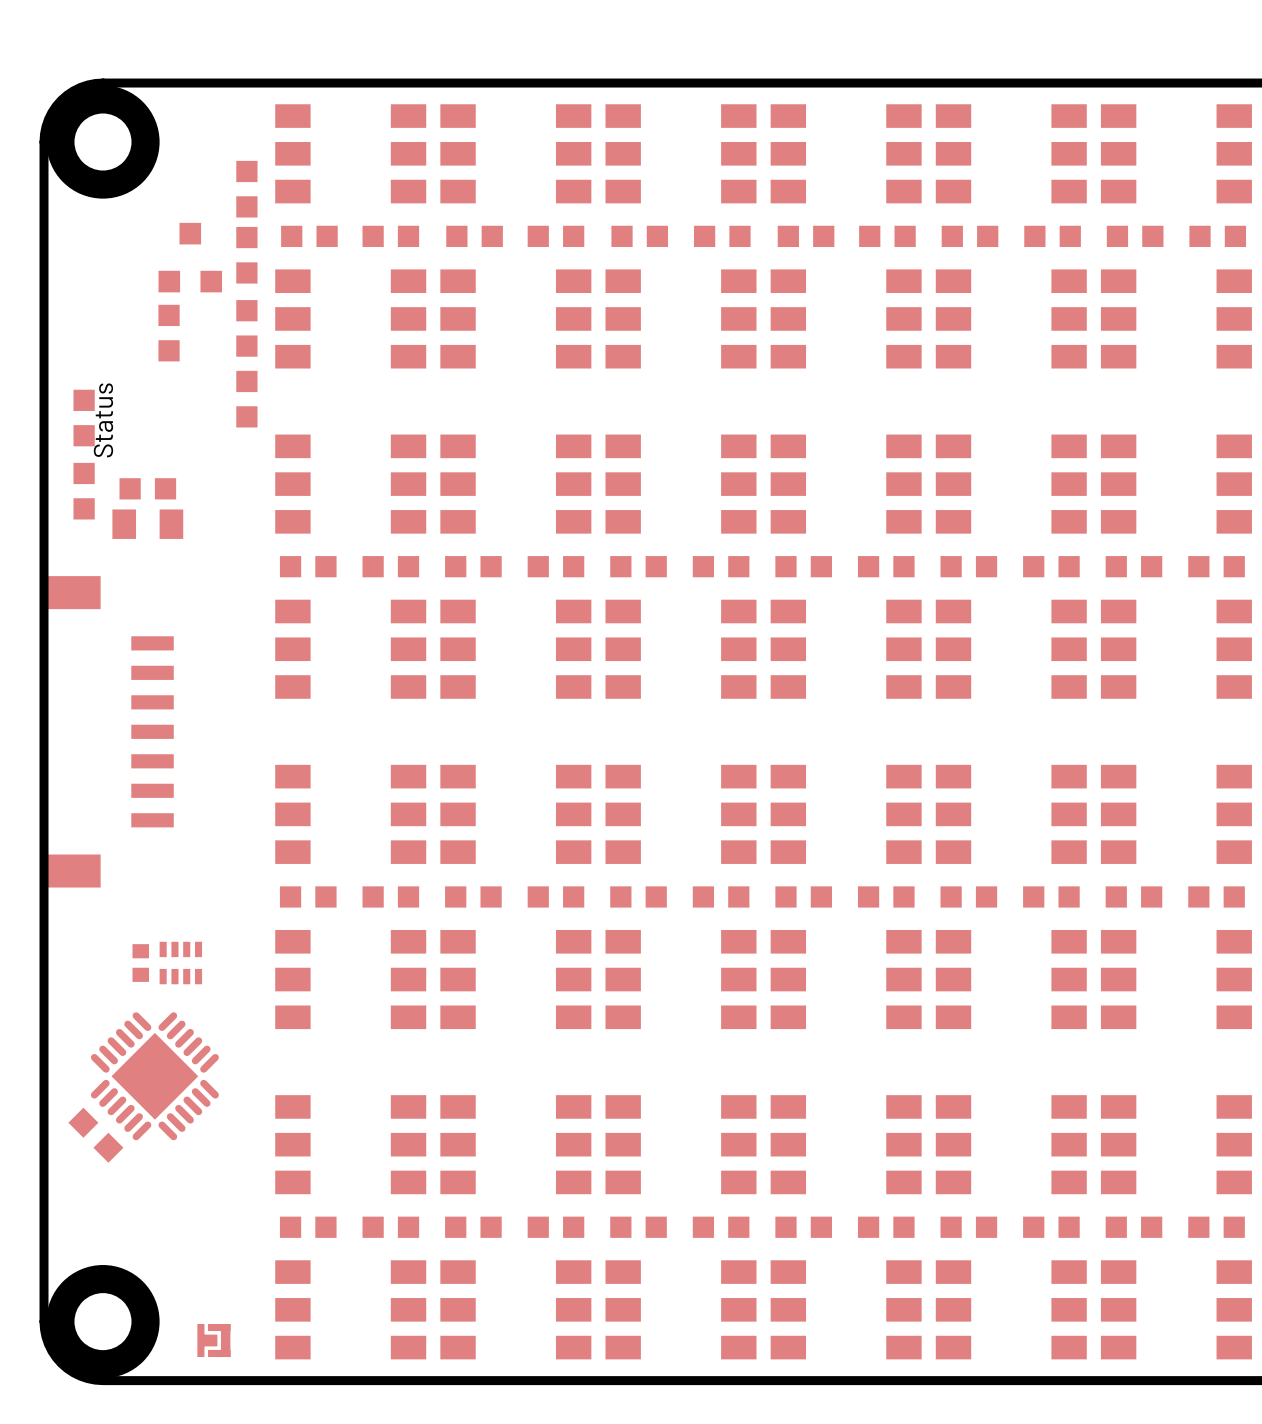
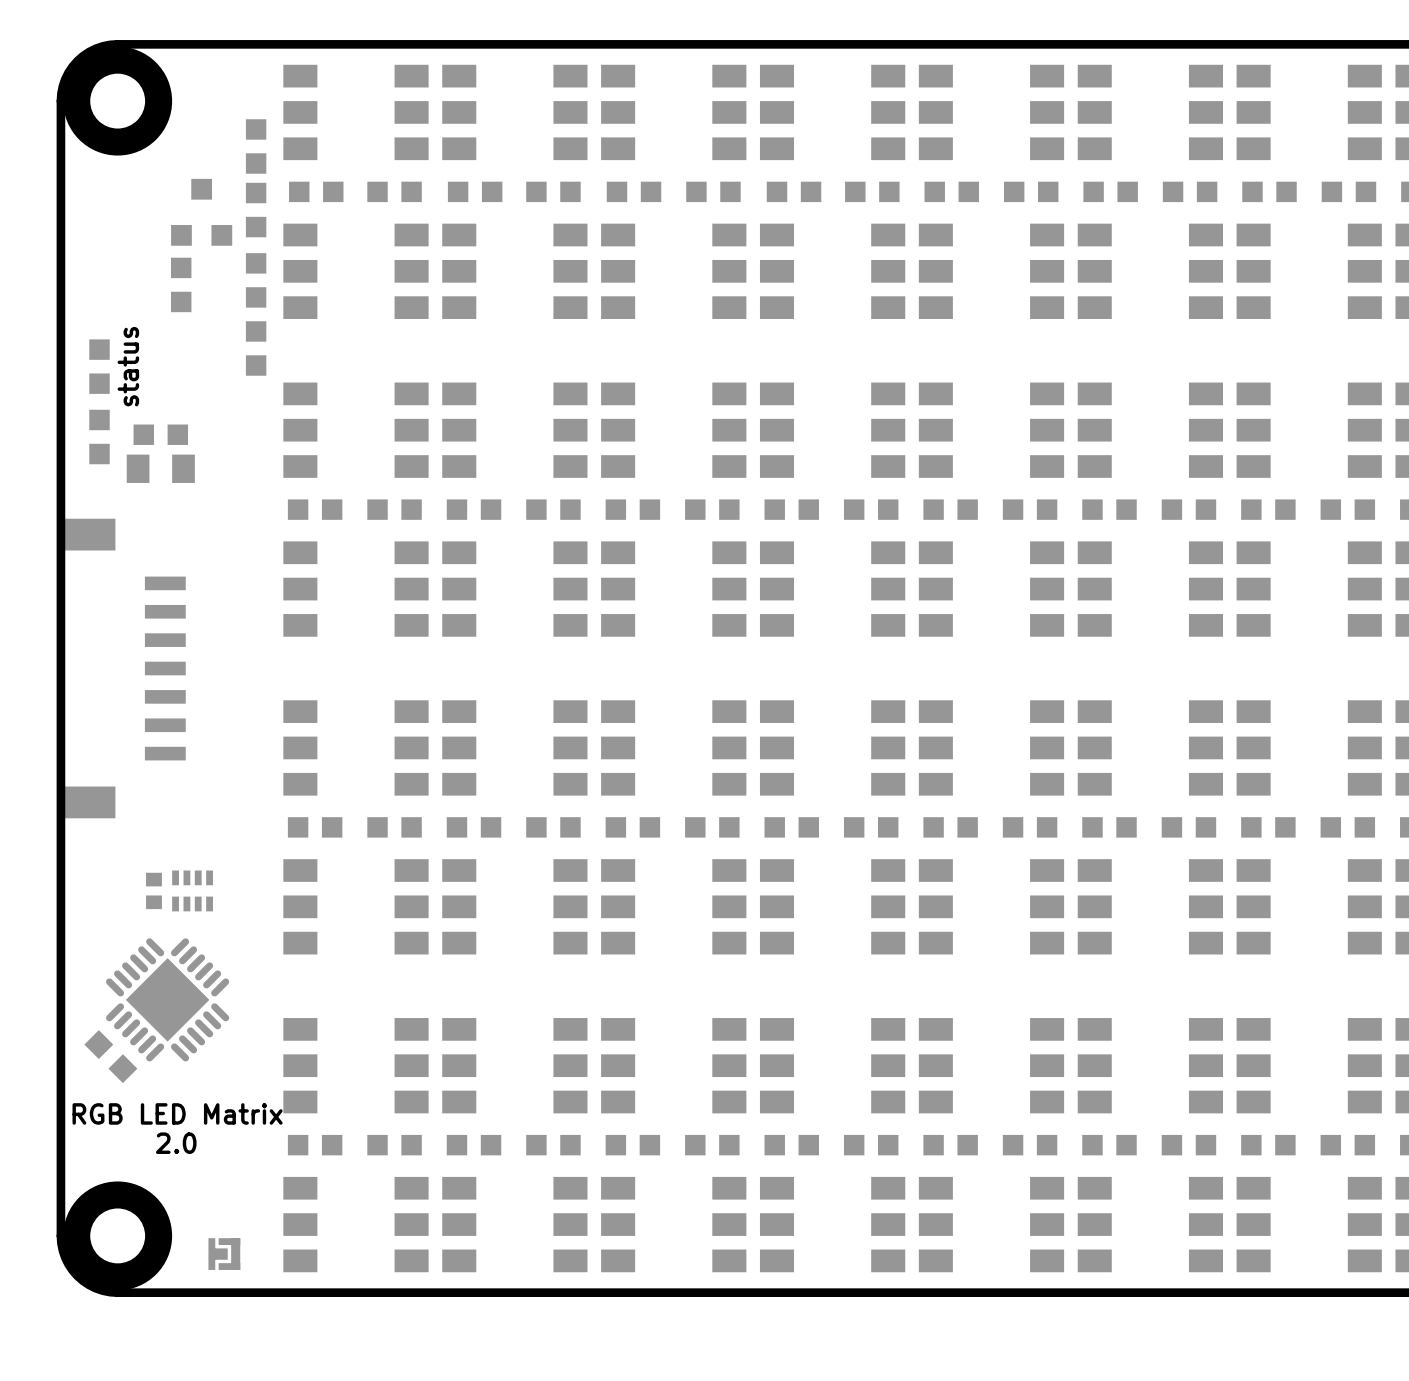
text: Status (103, 420) -> status (128, 366)
text: none -> RGB LED Matrix (177, 1113)
text: none -> 2.0 (176, 1143)

